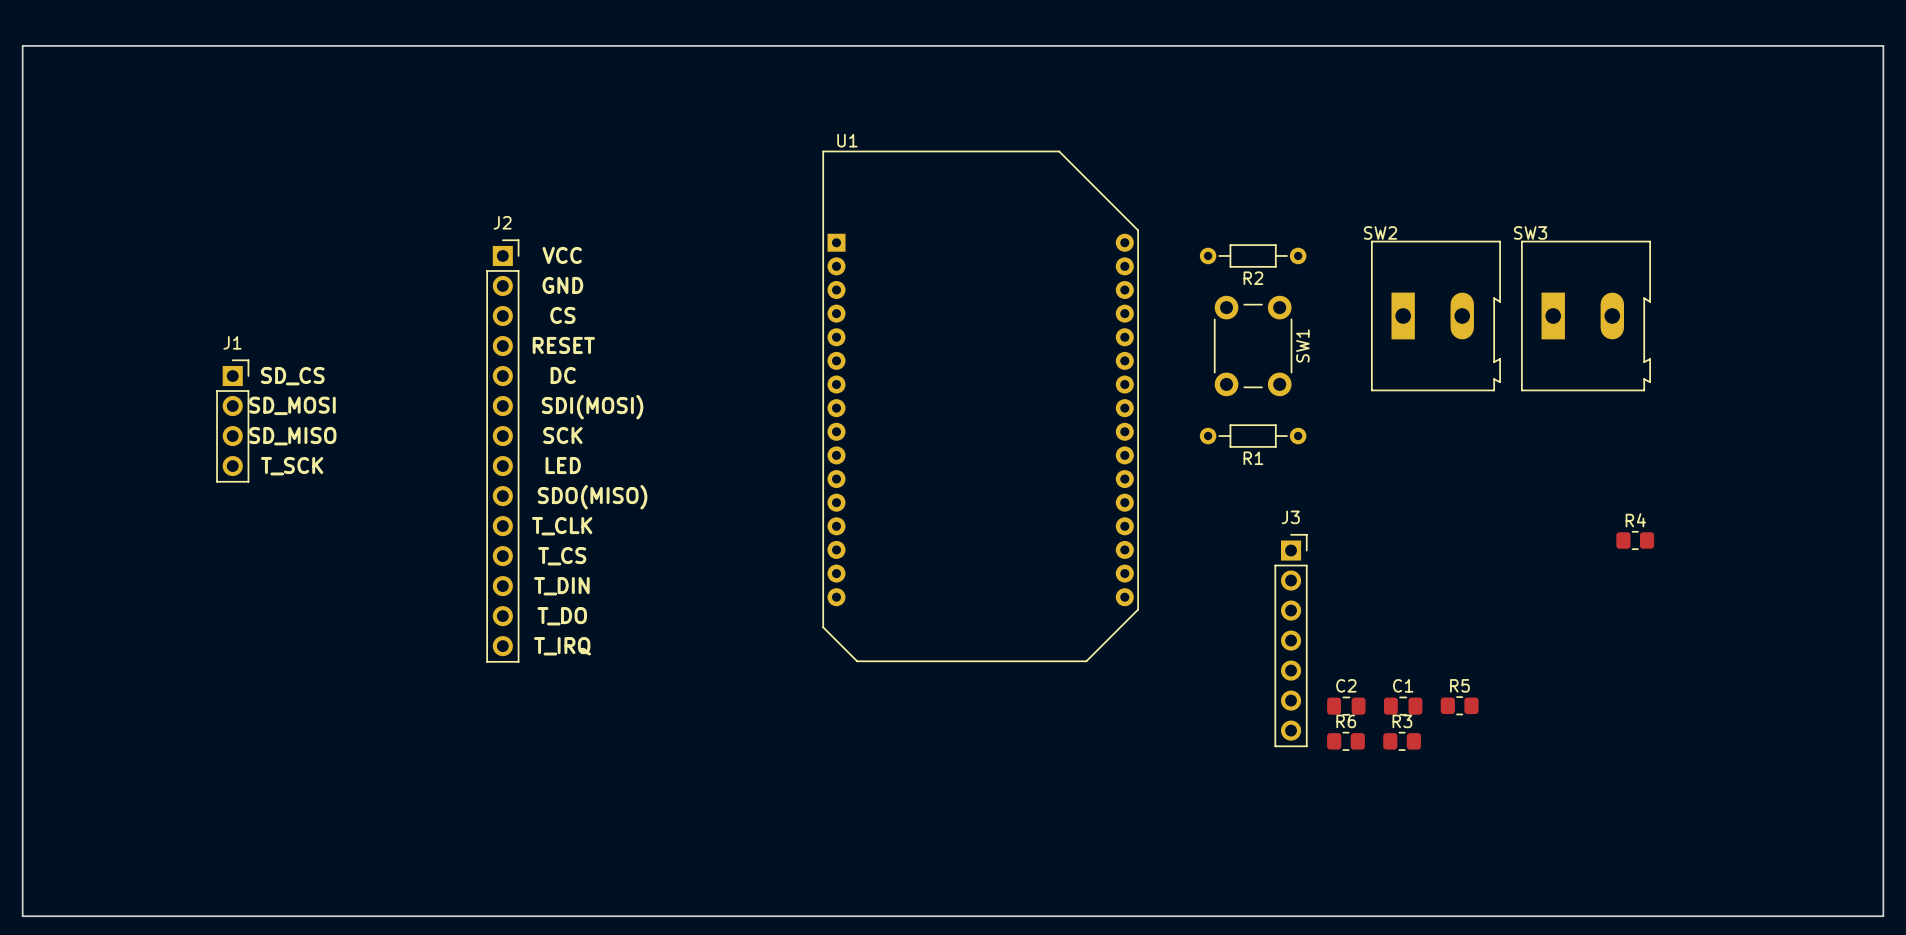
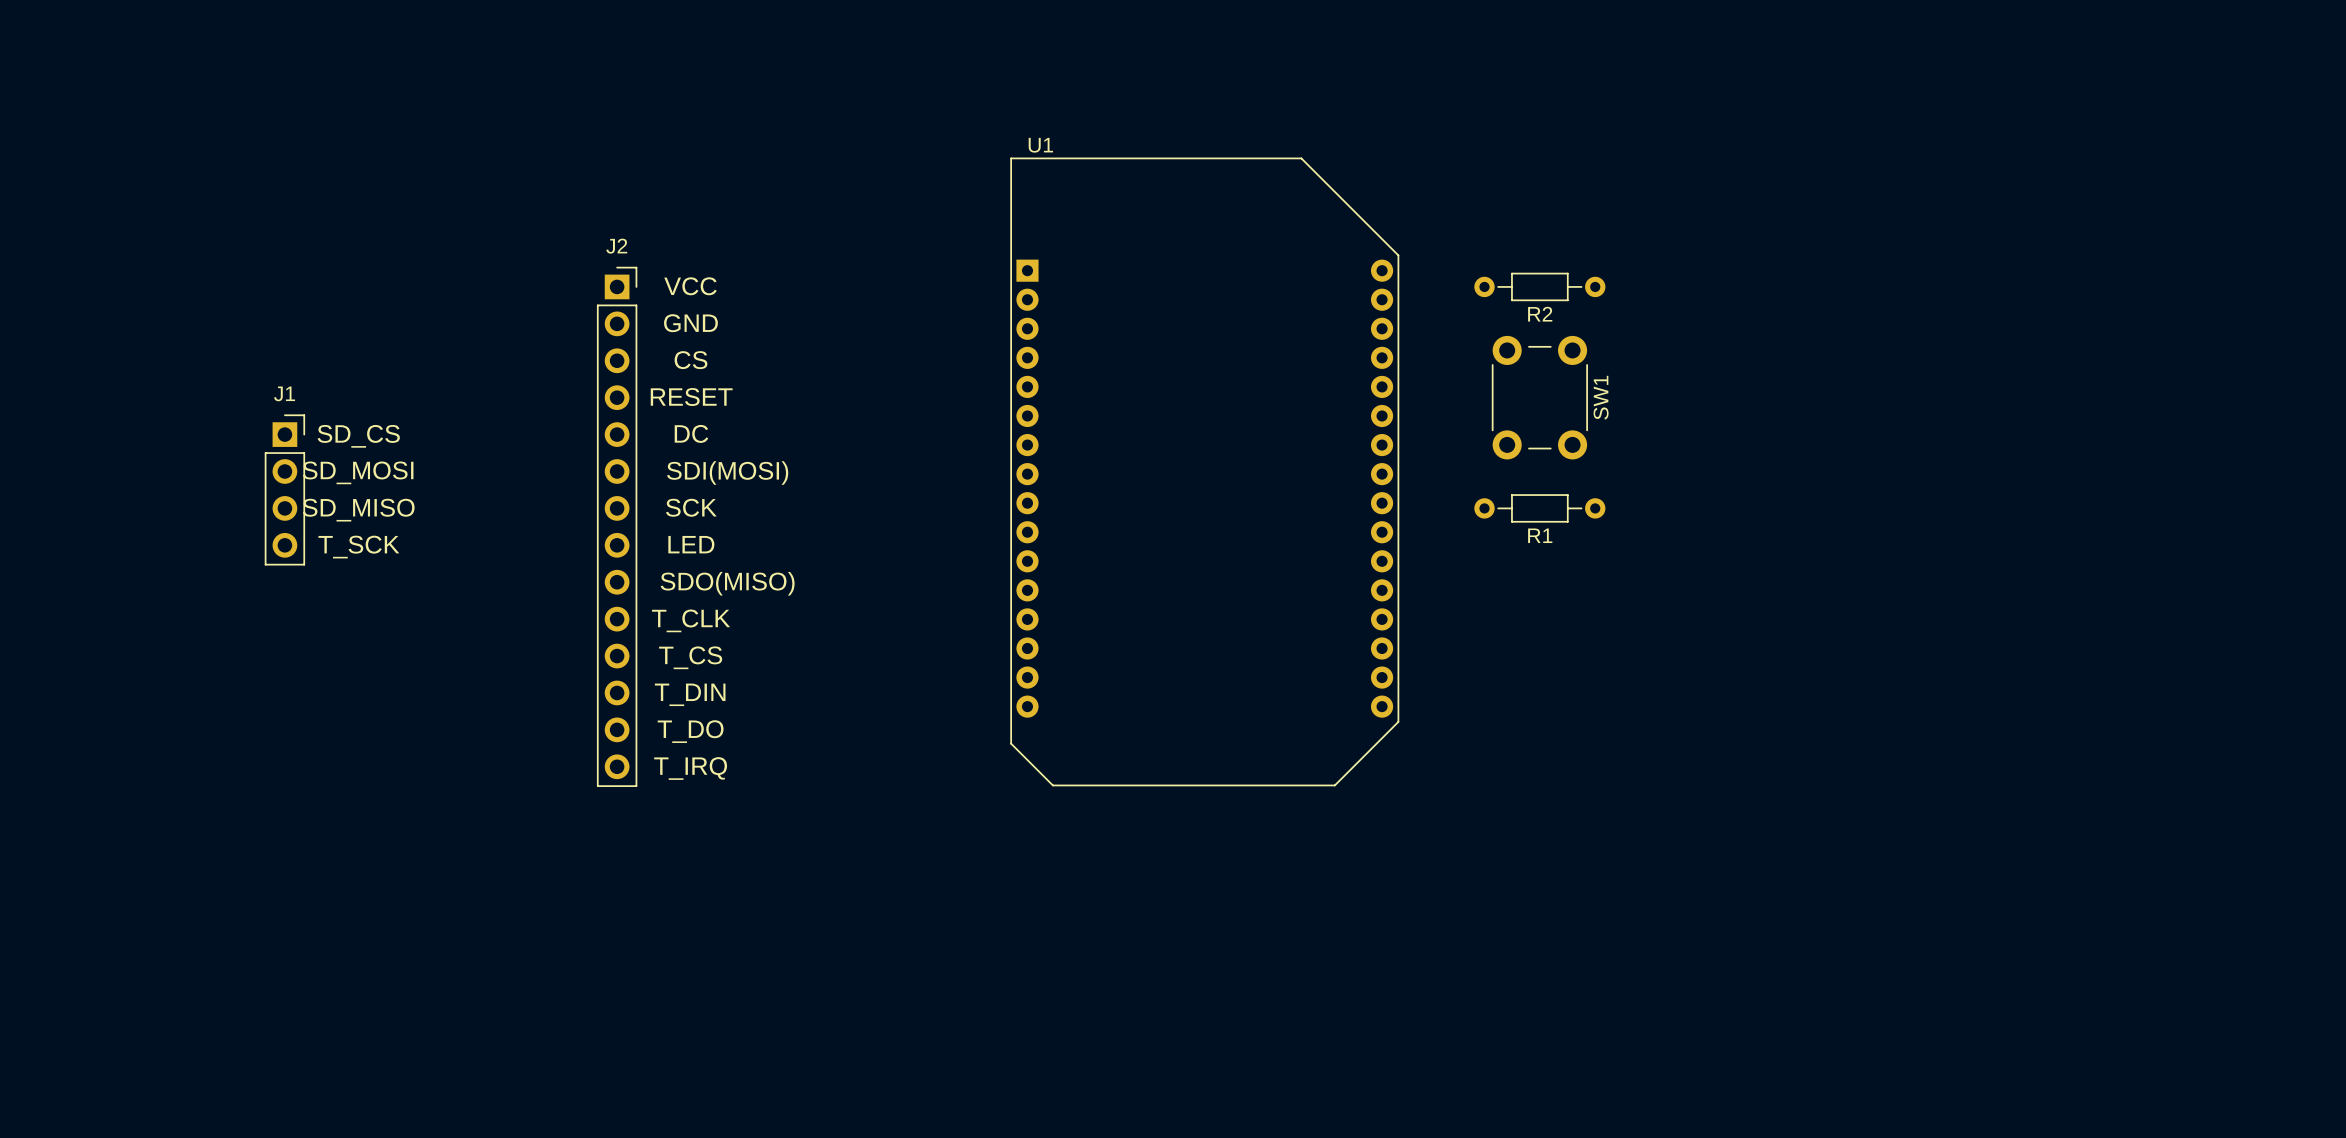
board edge: (22, 45) (1883, 45) (1883, 916) (22, 916) (22, 45) -> none
SW2: (1435, 315) -> none
SW3: (1586, 315) -> none
R4: (1635, 540) -> none
J3: (1291, 640) -> none
R5: (1459, 705) -> none
C2: (1346, 706) -> none
C1: (1403, 706) -> none
R6: (1345, 741) -> none
R3: (1402, 741) -> none

